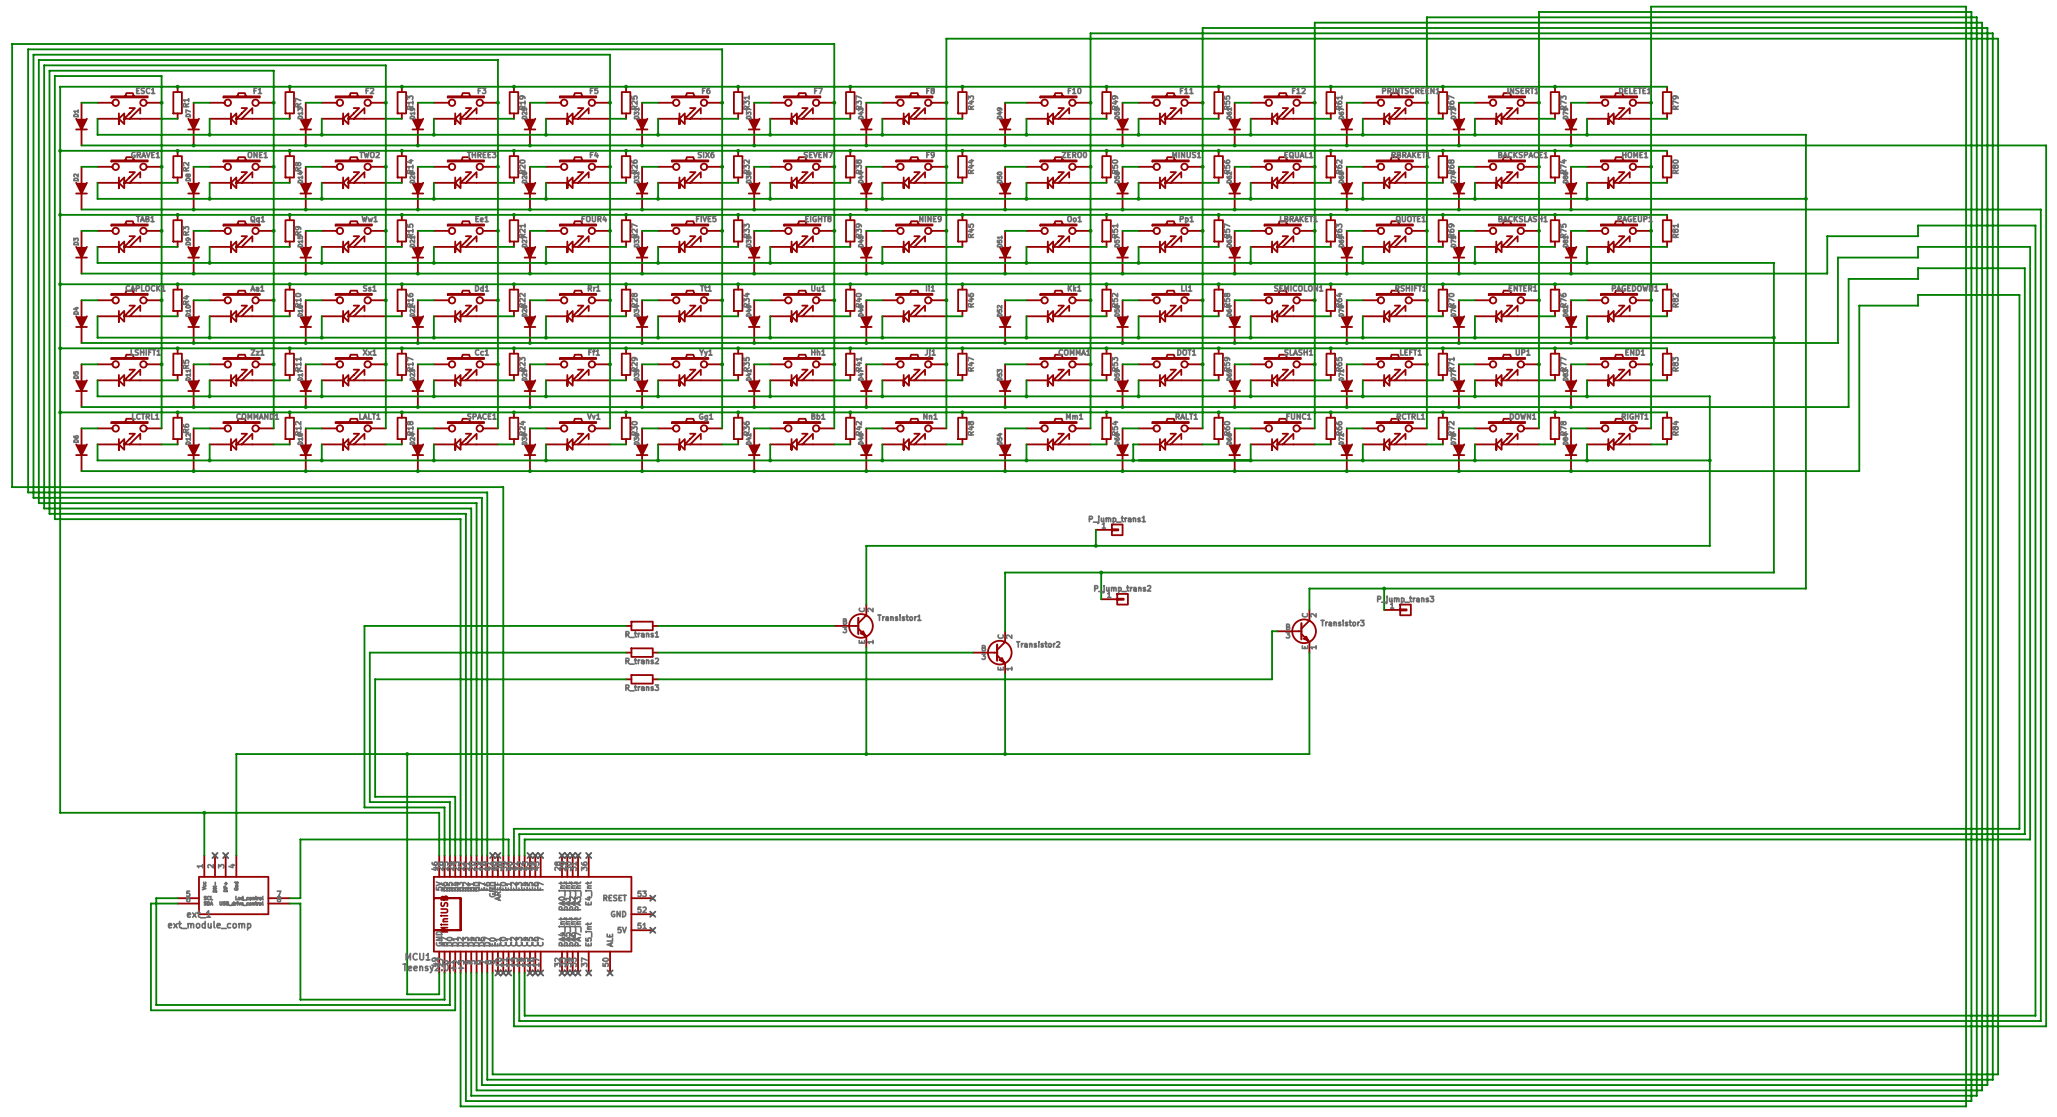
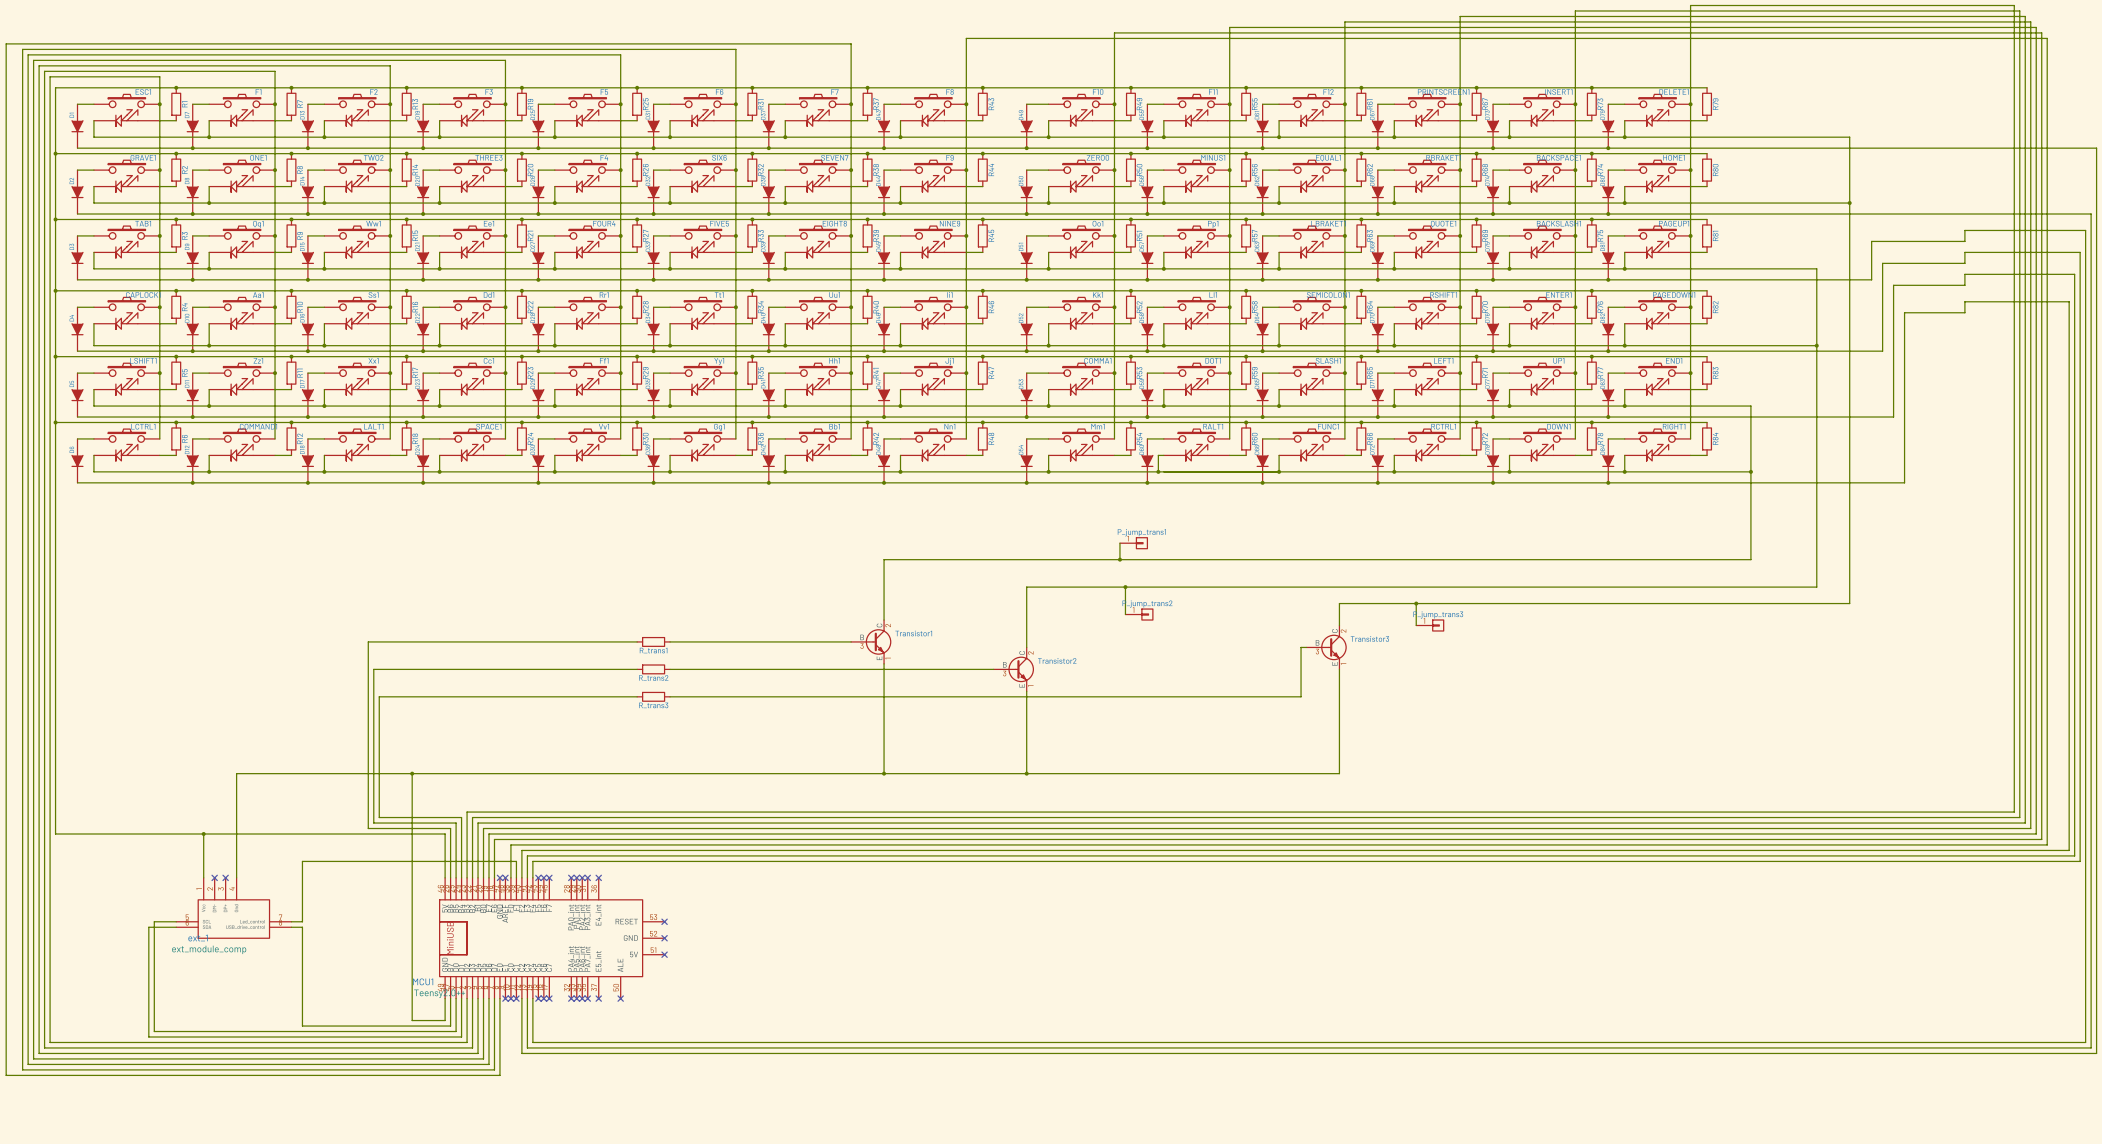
wire: (12, 487) (503, 487) (503, 823) -> (6, 499) (6, 1075) (499, 1075)
wire: (28, 492) (487, 492) (487, 818) -> (22, 504) (22, 1069) (494, 1069)
wire: (33, 497) (481, 497) (481, 812) -> (28, 510) (28, 1064) (489, 1064)
wire: (38, 503) (476, 503) (476, 807) -> (33, 515) (33, 1058) (483, 1058)
wire: (44, 508) (471, 508) (471, 802) -> (39, 521) (39, 1053) (478, 1053)
wire: (49, 513) (465, 513) (465, 796) -> (44, 526) (44, 1047) (472, 1047)
wire: (54, 519) (460, 519) (460, 791) -> (50, 532) (50, 1042) (467, 1042)
wire: (1966, 791) (1966, 1106) (460, 1106) (460, 1015) -> (2014, 812) (467, 812)
wire: (1971, 796) (1971, 1101) (465, 1101) (465, 1020) -> (2019, 817) (472, 817)
wire: (1976, 802) (1976, 1095) (471, 1095) (471, 1026) -> (2025, 823) (478, 823)
wire: (1982, 807) (1982, 1090) (476, 1090) (476, 1031) -> (2030, 828) (483, 828)
wire: (1987, 812) (1987, 1085) (481, 1085) (481, 1037) -> (2036, 833) (489, 833)
wire: (1992, 818) (1992, 1079) (487, 1079) (487, 1042) -> (2041, 839) (494, 839)
wire: (1998, 823) (1998, 1074) (492, 1074) (492, 1047) -> (2047, 844) (510, 844)

